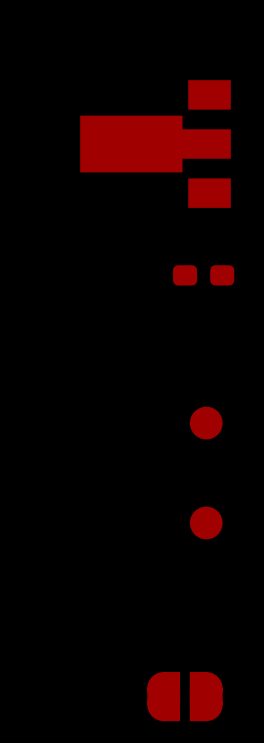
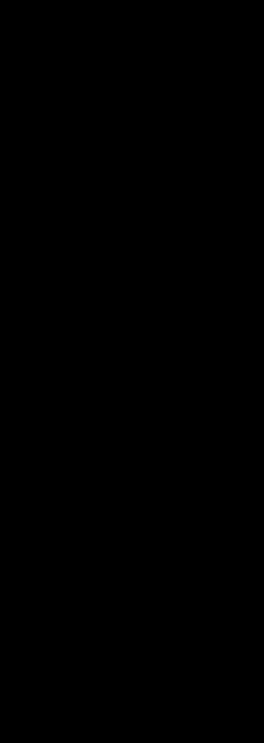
part: (155, 144) -> none
part: (203, 275) -> none
part: (206, 423) -> none
part: (206, 522) -> none
part: (184, 696) -> none

